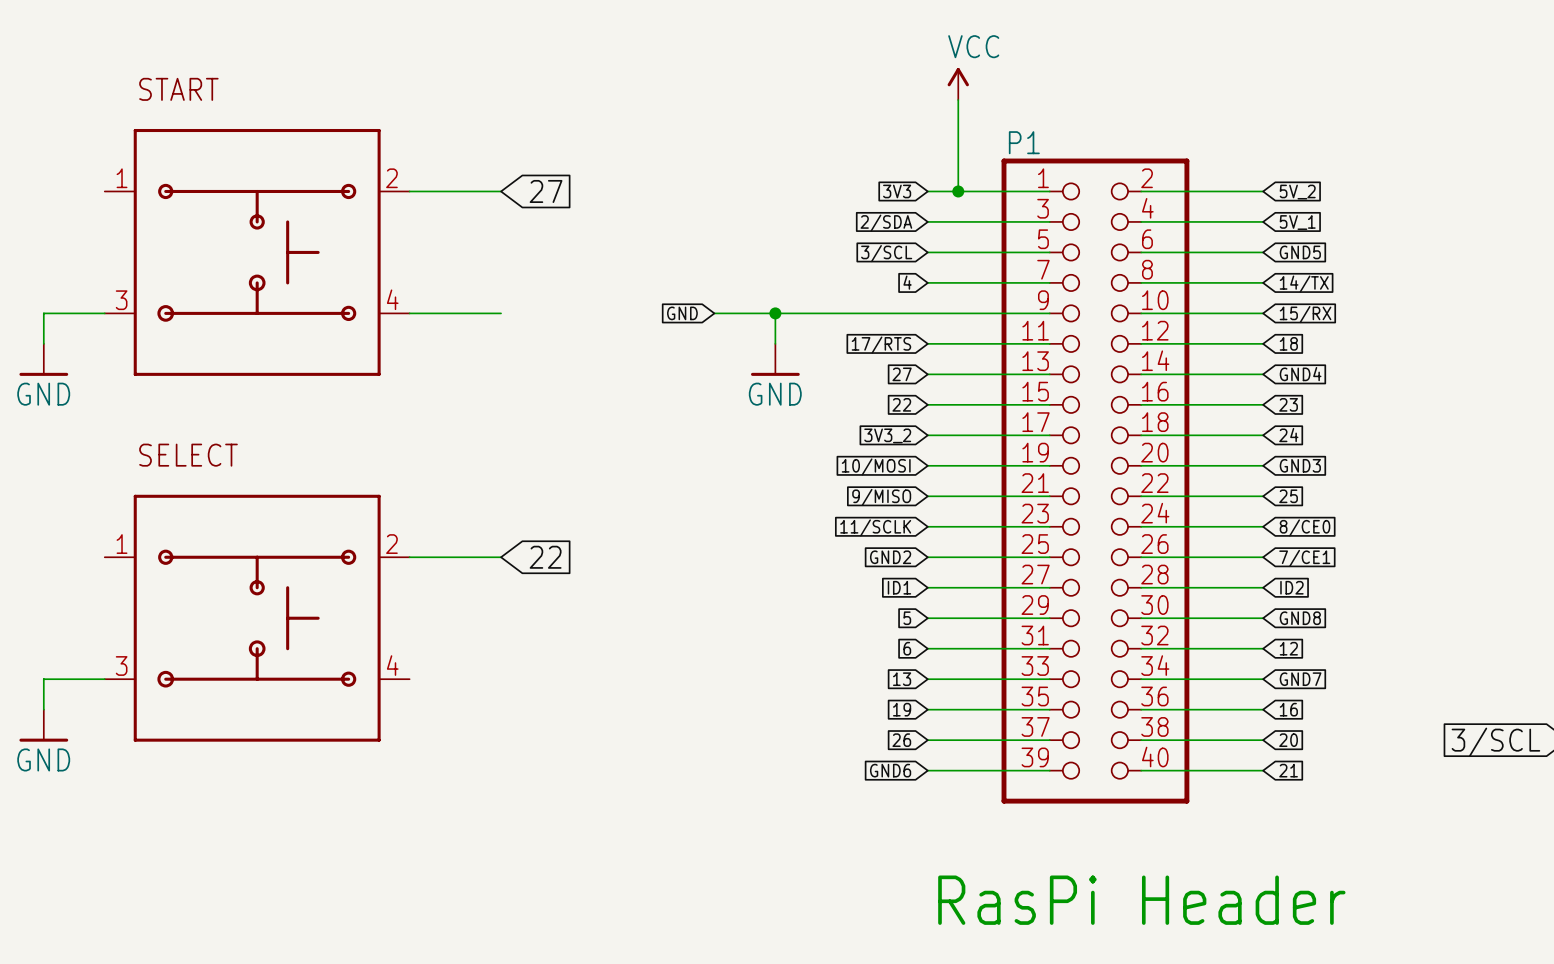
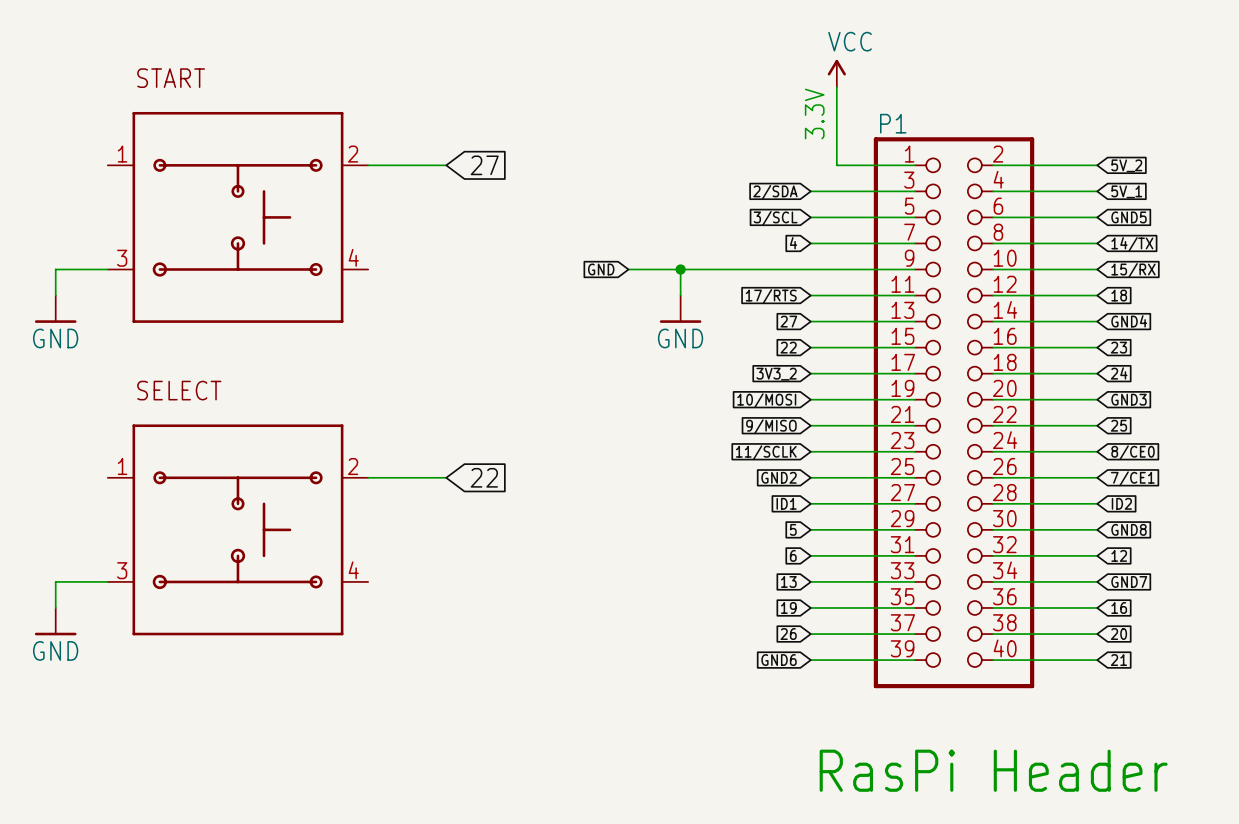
text: none -> 3.3V (814, 114)
global label: 3V3 (897, 191) -> none
wire: (927, 191) (958, 191) -> none
junction: (958, 191) -> none
wire: (409, 313) (501, 313) -> none

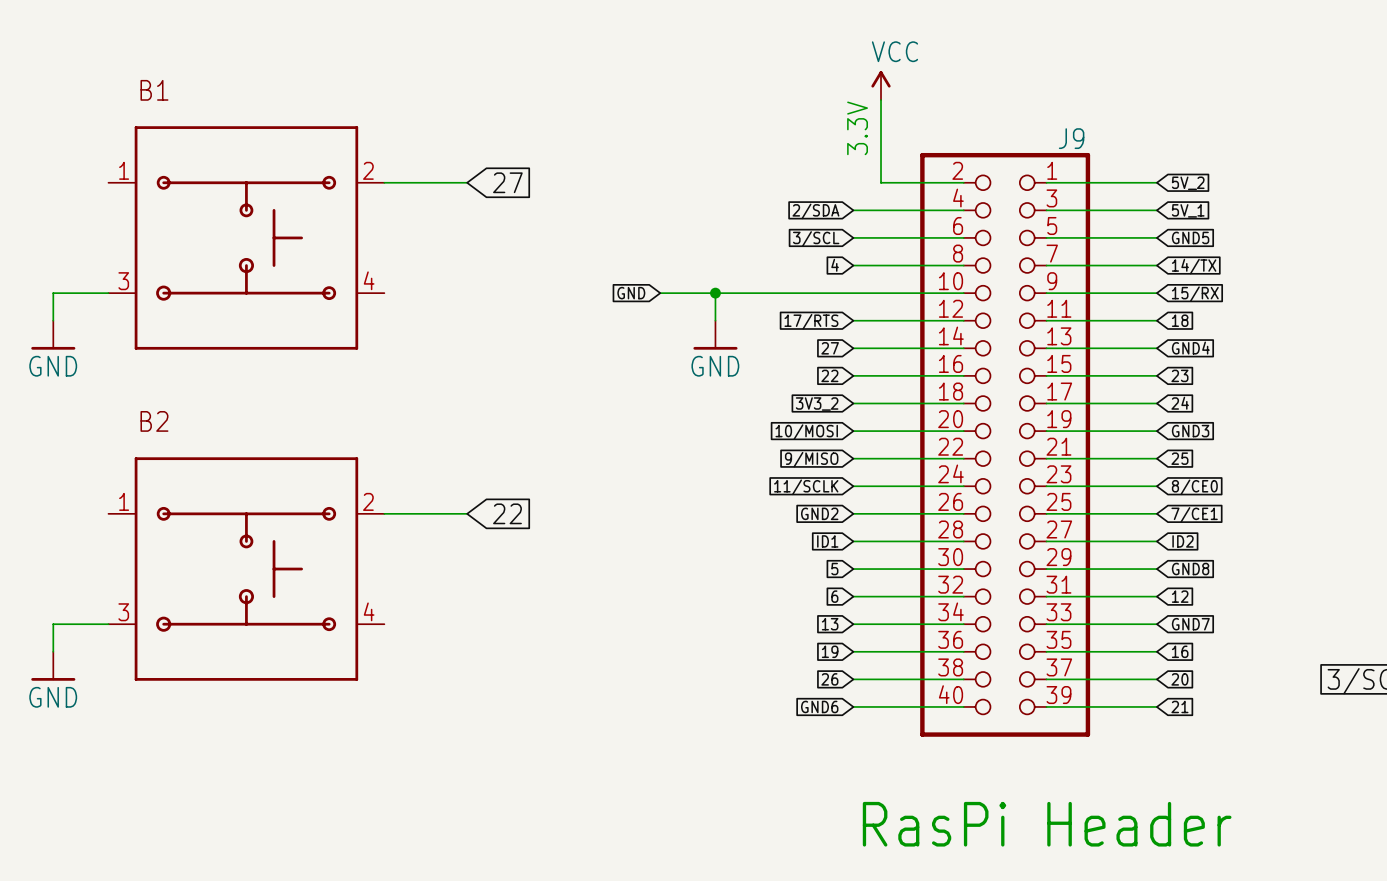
START name: START (171, 78) -> B1 (154, 90)
P1 name: P1 (893, 123) -> J9 (1071, 138)
SELECT name: SELECT (179, 390) -> B2 (154, 421)
P1 flip: as is (954, 412) -> left-right (1005, 444)

